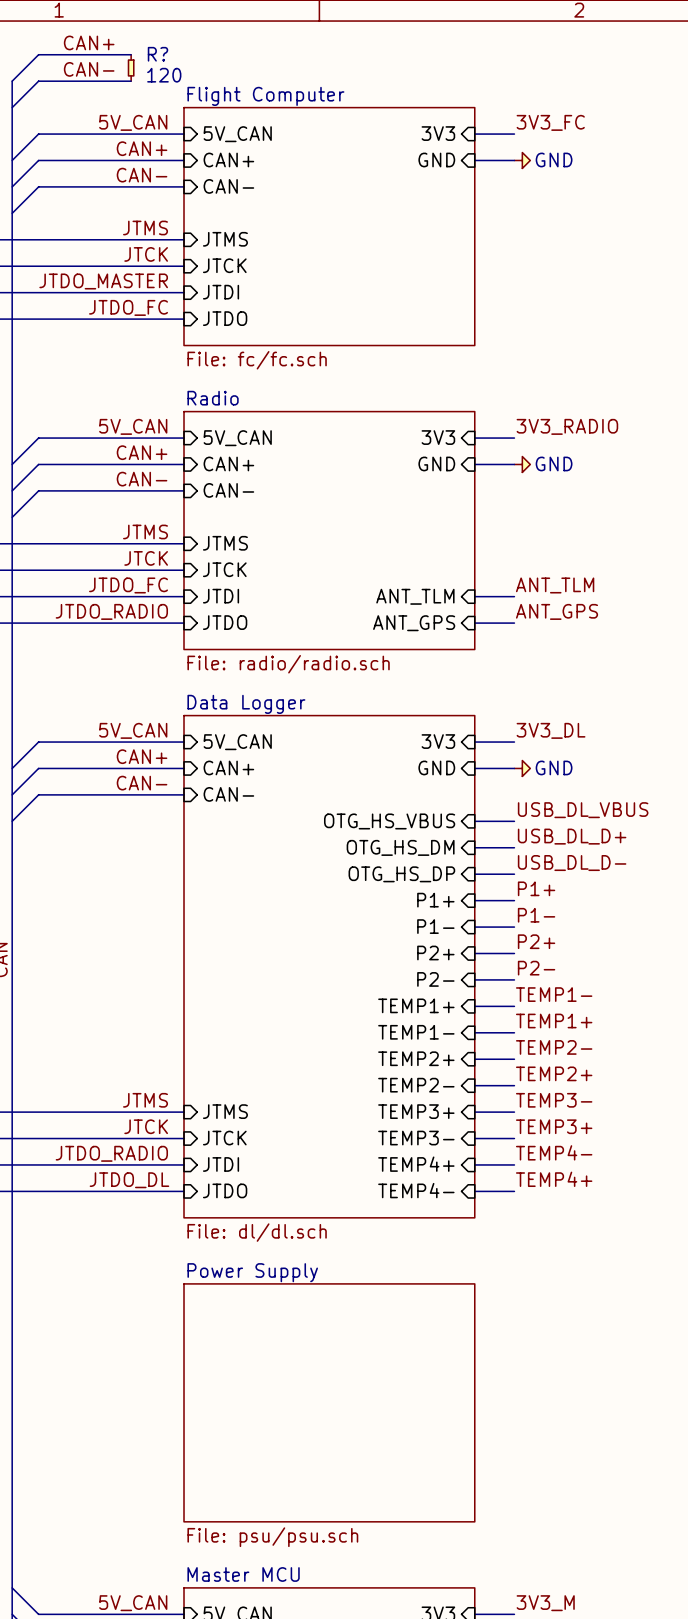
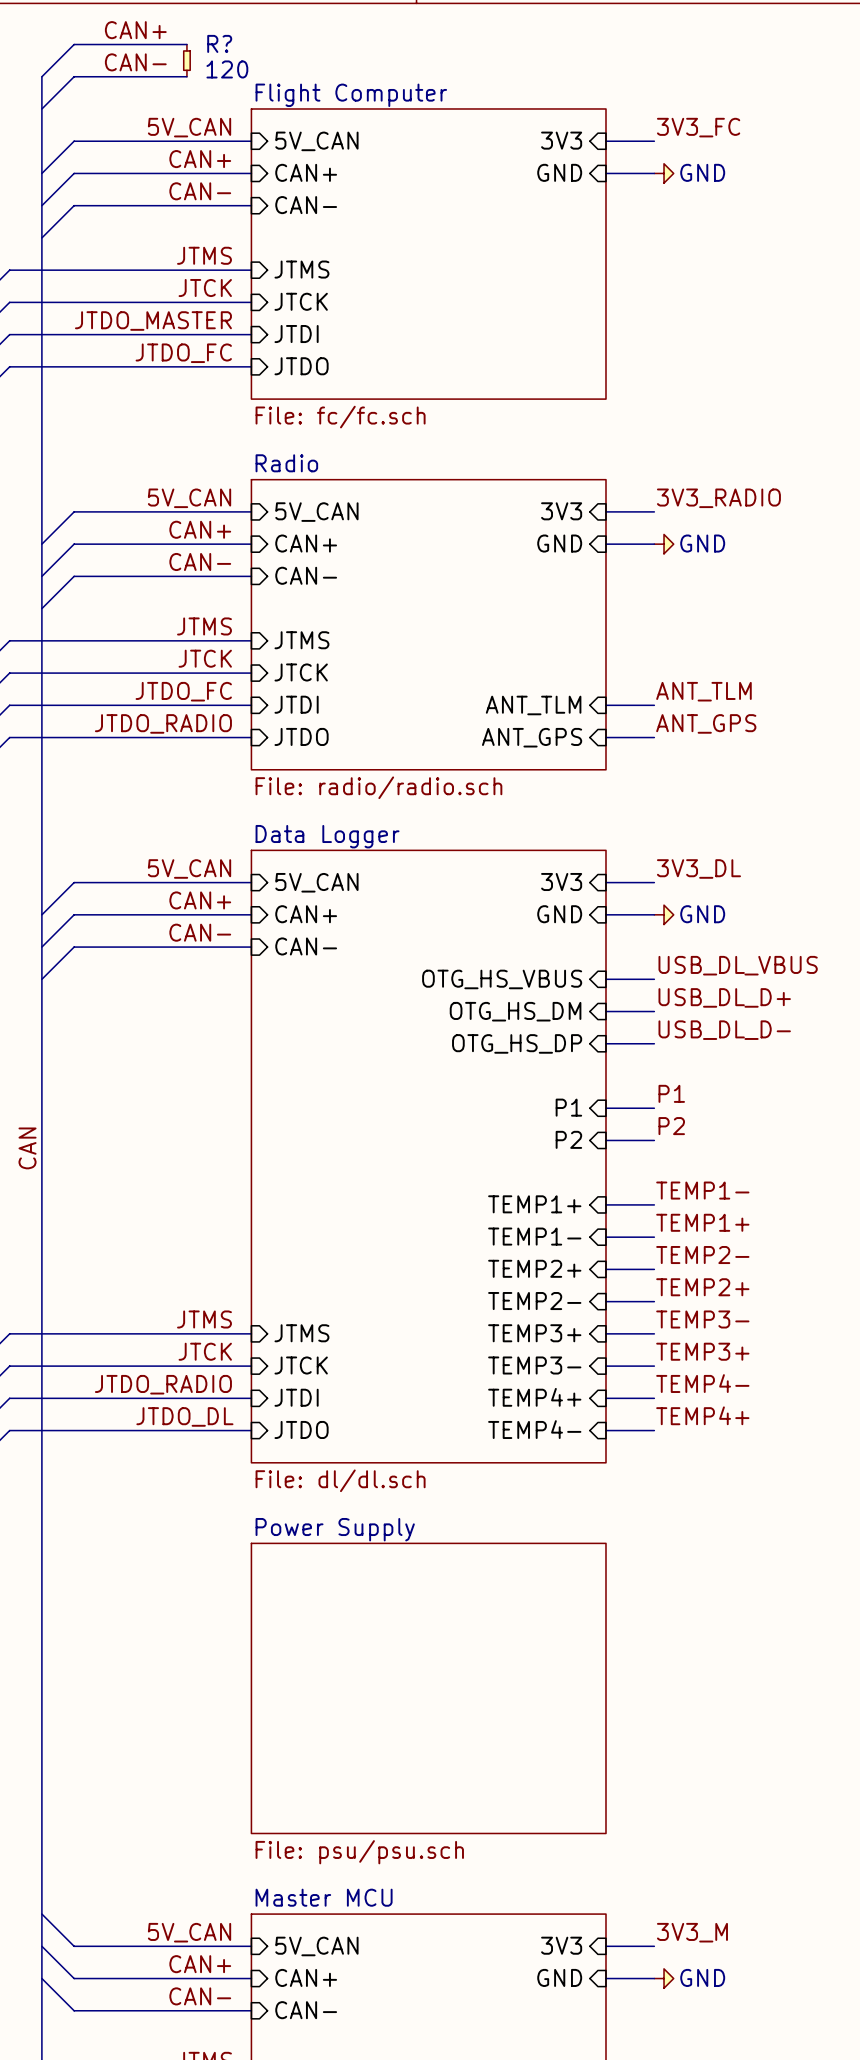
label: P1+ (536, 888) -> none
sheet pin: P1+ (435, 900) -> none
wire: (474, 900) (514, 900) -> none
label: P1- (536, 915) -> P1 (671, 1093)
sheet pin: P1- (435, 926) -> P1 (568, 1107)
label: P2+ (536, 941) -> P2 (671, 1126)
sheet pin: P2+ (435, 953) -> P2 (568, 1139)
label: P2- (536, 968) -> none
sheet pin: P2- (435, 979) -> none
wire: (474, 979) (514, 979) -> none

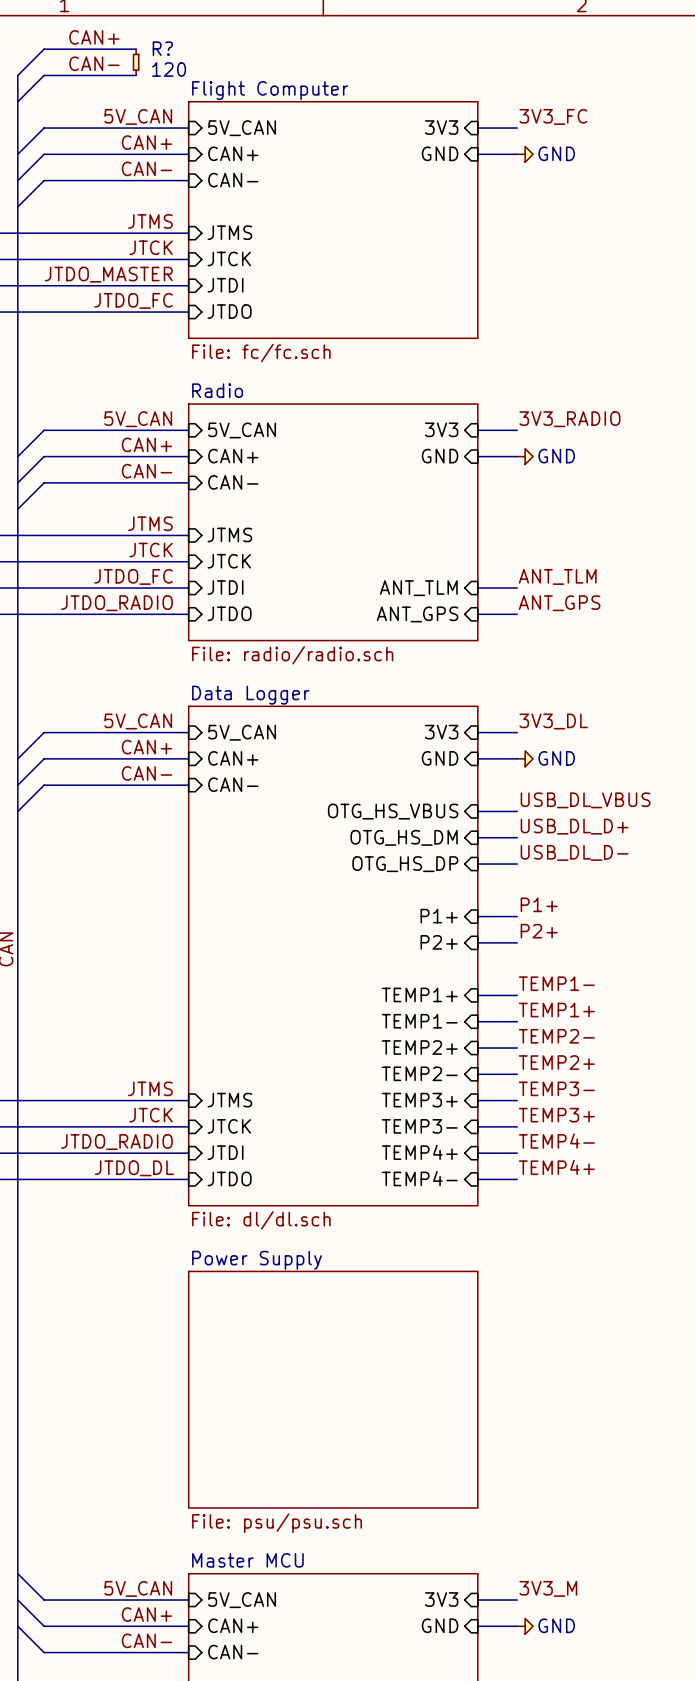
label: P1 (671, 1093) -> P1+ (539, 904)
sheet pin: P1 (568, 1107) -> P1+ (439, 916)
label: P2 (671, 1126) -> P2+ (539, 931)
sheet pin: P2 (568, 1139) -> P2+ (439, 942)

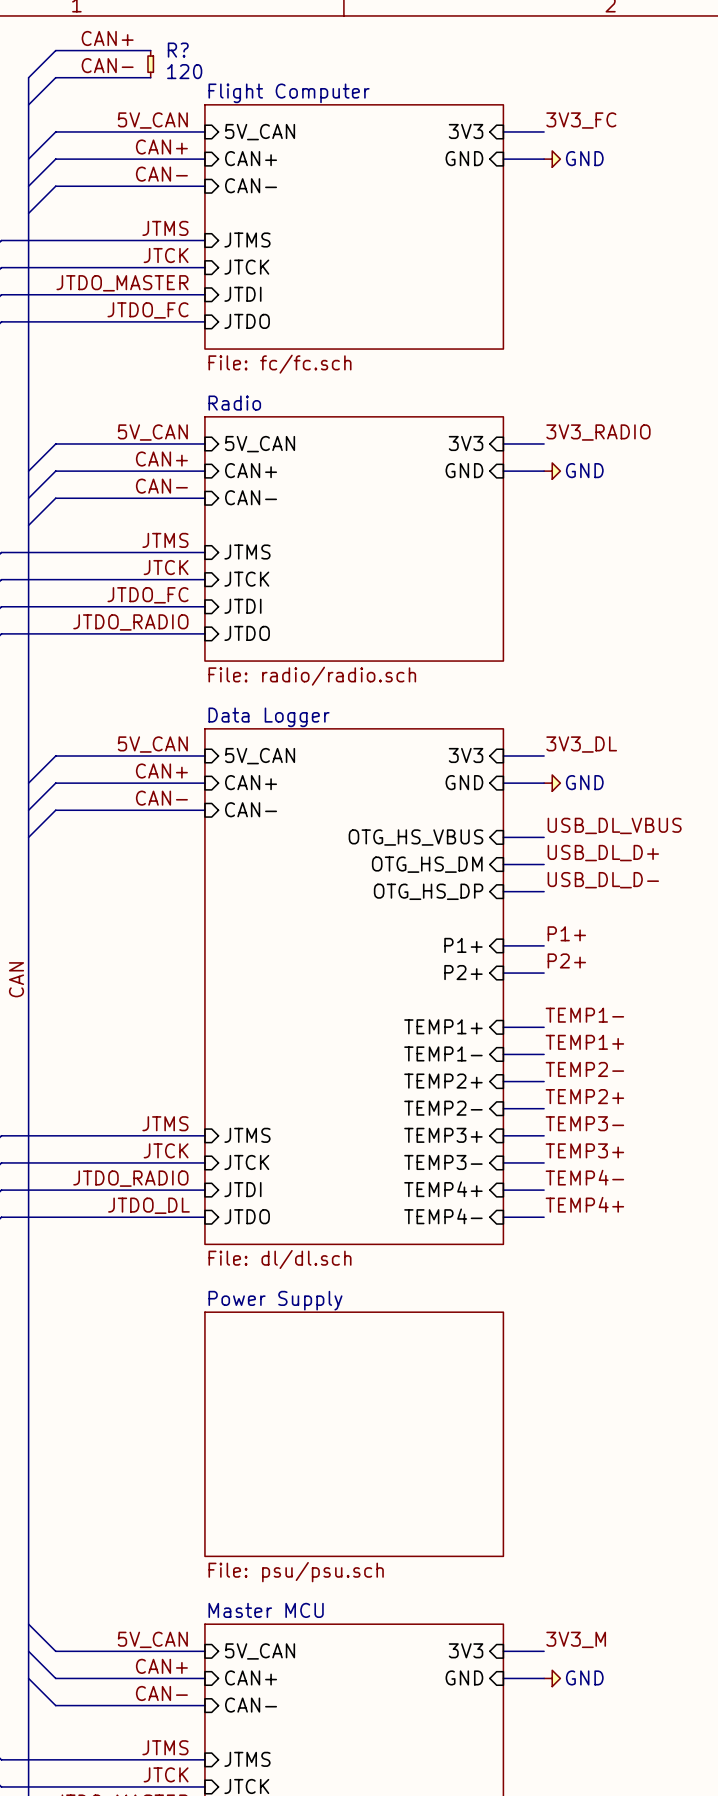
label: ANT_TLM (557, 576) -> none
sheet pin: ANT_TLM (418, 588) -> none
wire: (477, 588) (517, 588) -> none
label: ANT_GPS (559, 603) -> none
sheet pin: ANT_GPS (417, 614) -> none
wire: (477, 614) (517, 614) -> none

